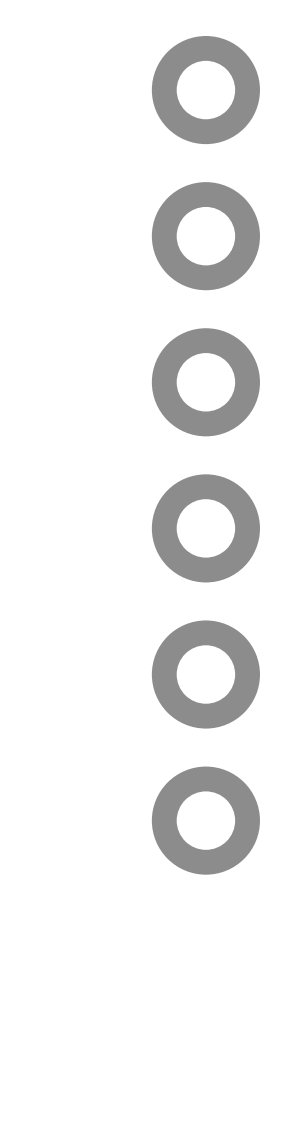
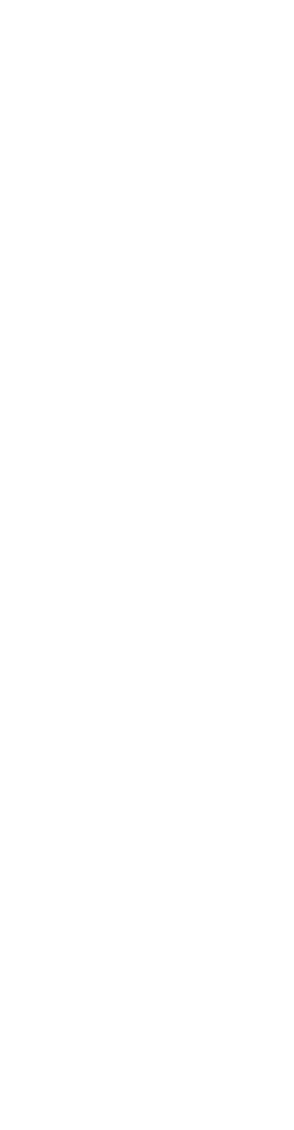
part: (205, 455) -> none

